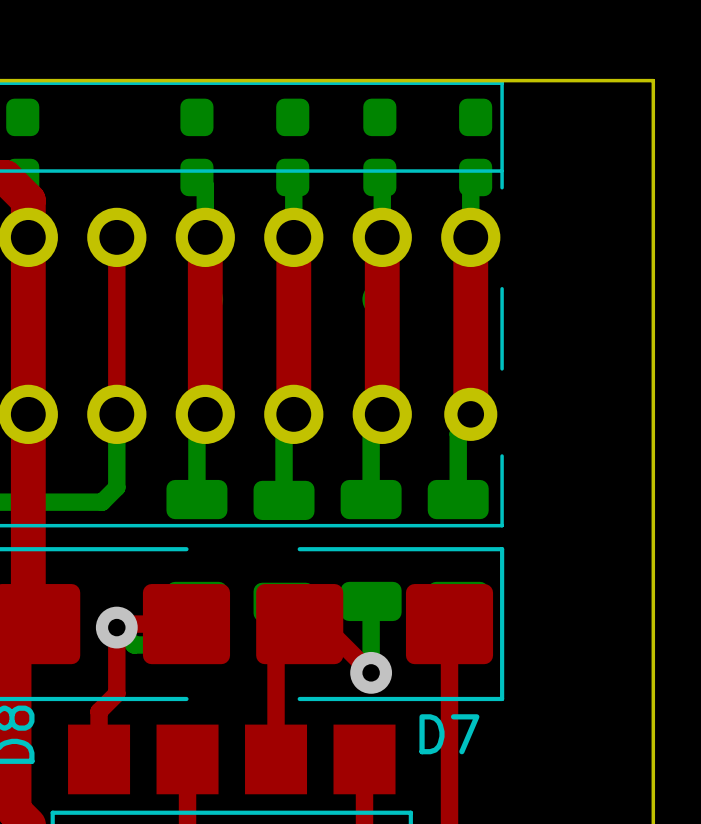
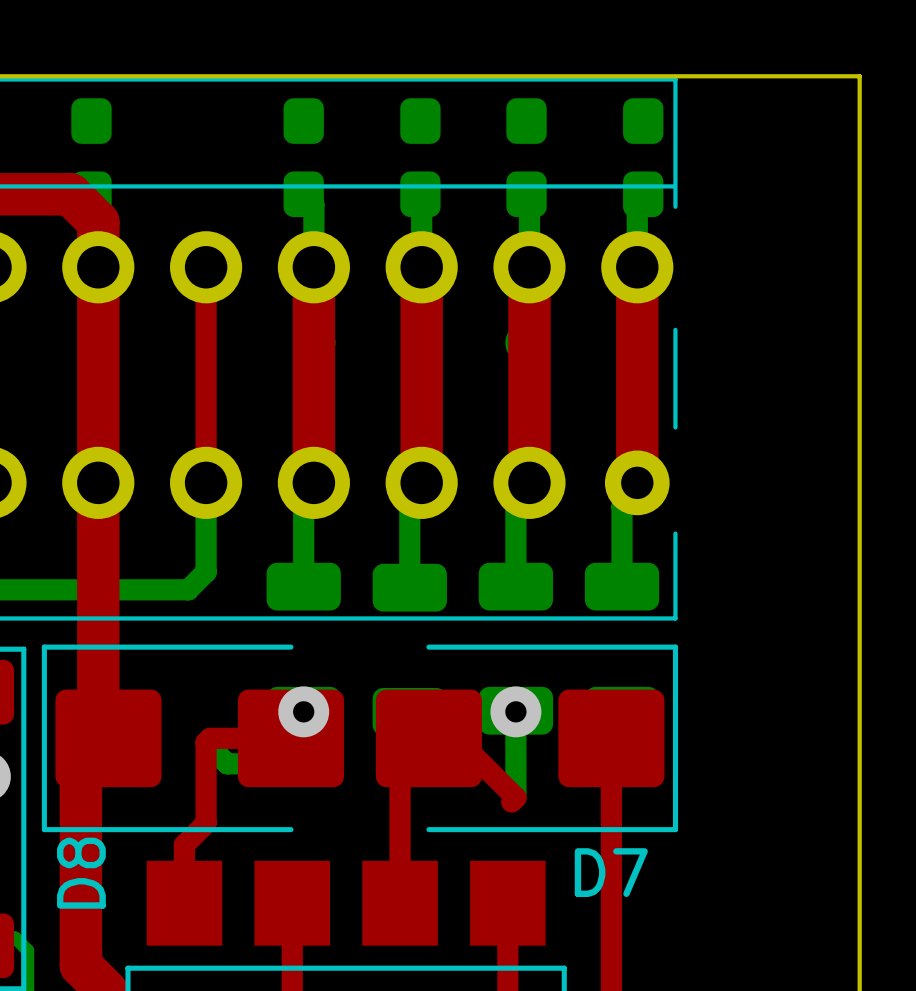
via position: (116, 627) -> (303, 711)
via position: (371, 672) -> (515, 711)

